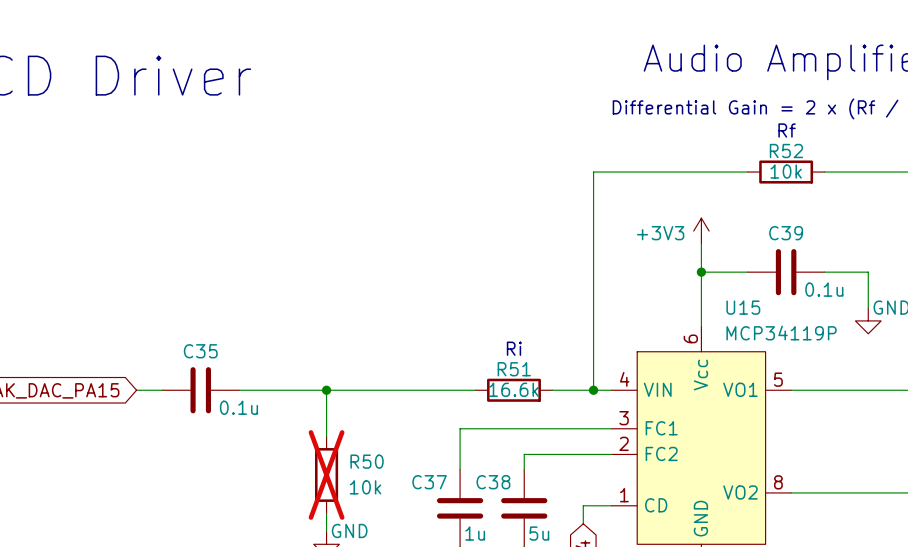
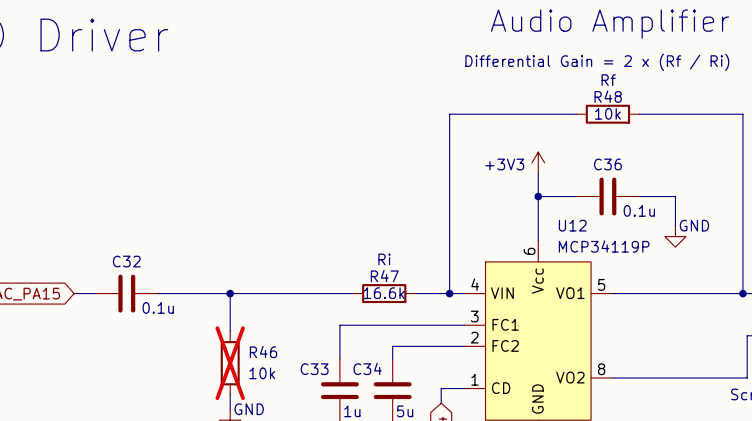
R52 name: R52 (786, 151) -> R48 (608, 96)
C39 name: C39 (786, 233) -> C36 (607, 164)
U15 name: U15 (743, 307) -> U12 (572, 225)
C35 name: C35 (200, 351) -> C32 (126, 261)
R51 name: R51 (514, 369) -> R47 (384, 276)
R50 name: R50 (367, 461) -> R46 (263, 352)
C37 name: C37 (429, 482) -> C33 (314, 369)
C38 name: C38 (493, 482) -> C34 (367, 368)

